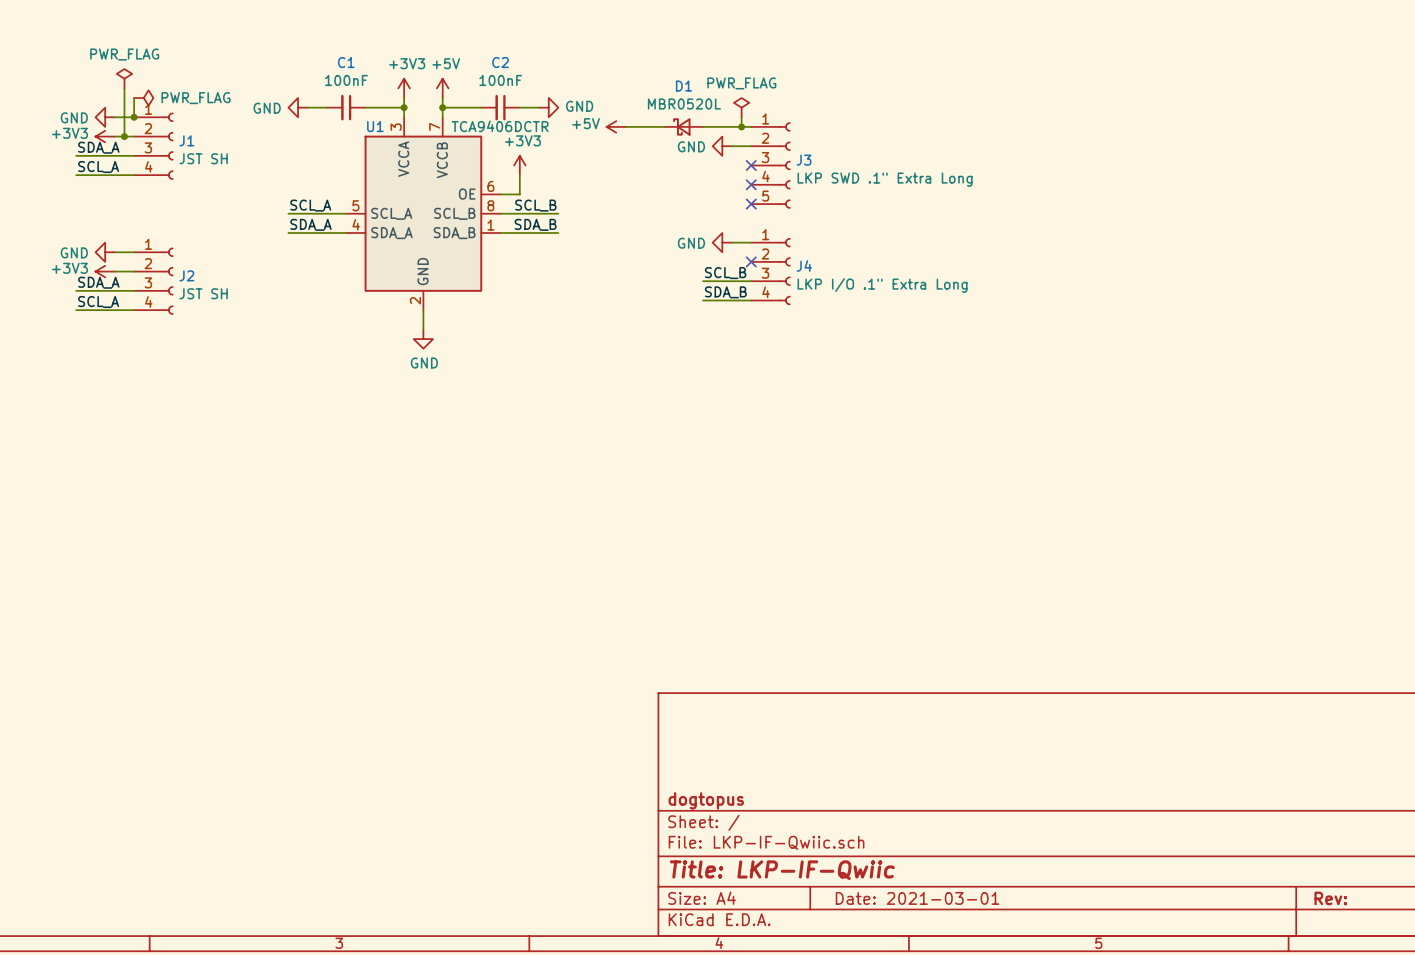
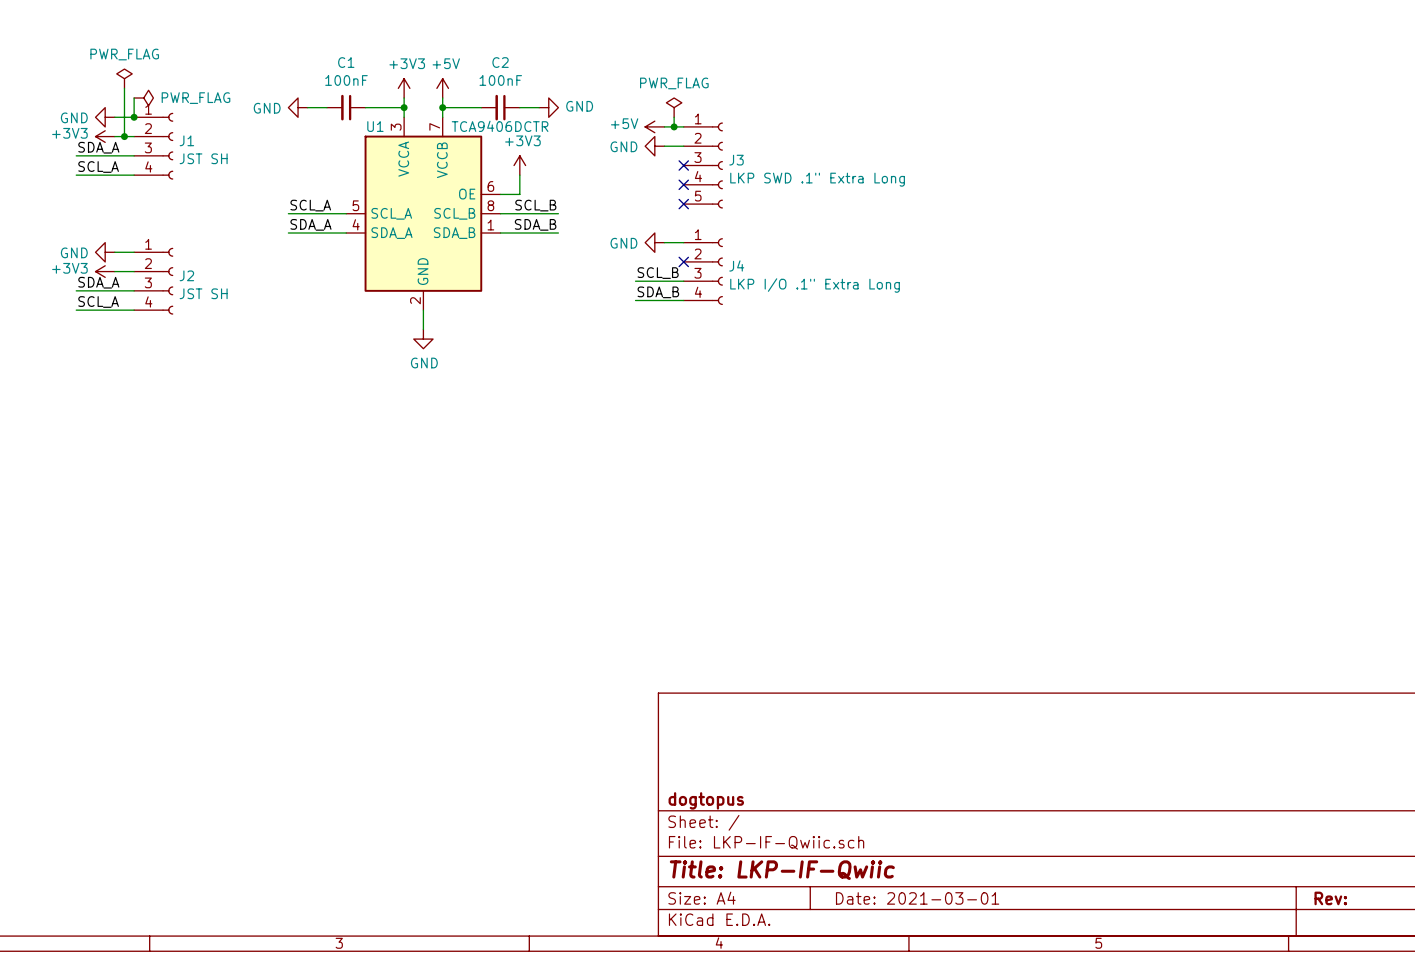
power symbol position: PWR_FLAG (741, 107) -> PWR_FLAG (674, 107)
wire: (741, 117) (741, 126) -> (674, 117) (674, 126)
power symbol position: +5V (616, 126) -> +5V (654, 126)
junction: none -> (674, 126)
D1: MBR0520L (683, 126) -> none
wire: (703, 126) (751, 126) -> none
junction: (741, 126) -> none
power symbol: none -> GND (654, 146)
power symbol: GND (722, 146) -> none
wire: (731, 146) (751, 146) -> (664, 146) (683, 146)
no-connect mark: none -> (683, 165)
no-connect mark: (751, 165) -> none
J3 position: (770, 165) -> (703, 165)
no-connect mark: none -> (683, 184)
no-connect mark: (751, 184) -> none
no-connect mark: none -> (683, 204)
no-connect mark: (751, 204) -> none
power symbol: none -> GND (654, 242)
power symbol: GND (722, 242) -> none
wire: (731, 242) (751, 242) -> (664, 242) (683, 242)
no-connect mark: none -> (683, 261)
no-connect mark: (751, 261) -> none
J4 position: (770, 271) -> (703, 271)
label position: SCL_B (725, 273) -> SCL_B (658, 273)
wire: (703, 281) (751, 281) -> (635, 281) (683, 281)
label position: SDA_B (725, 292) -> SDA_B (658, 292)
wire: (703, 300) (751, 300) -> (635, 300) (683, 300)

